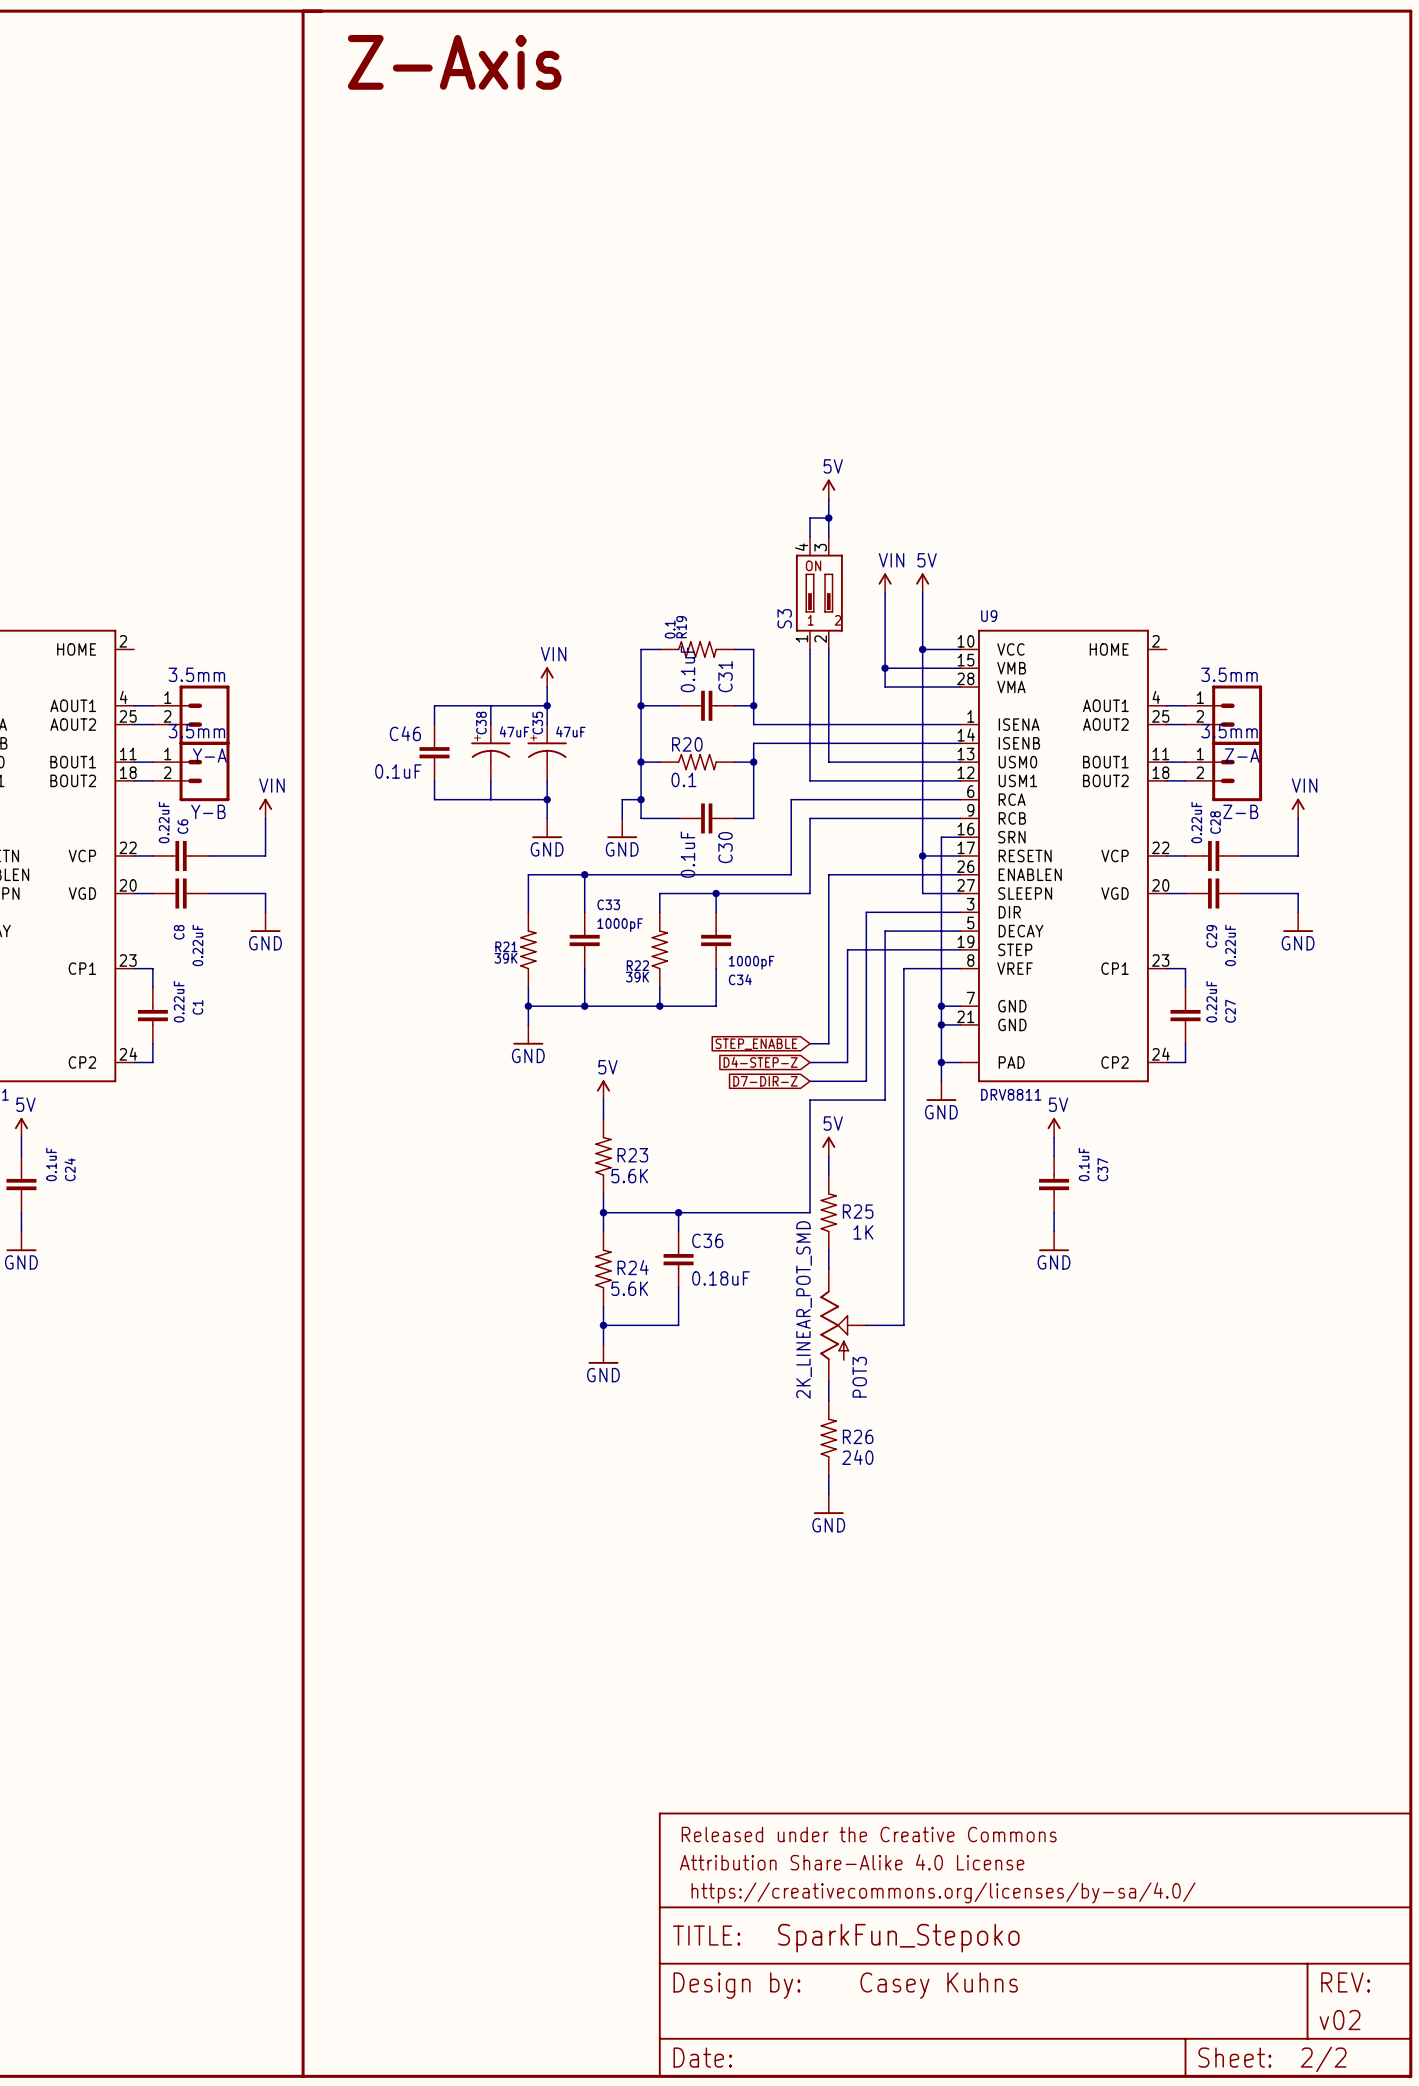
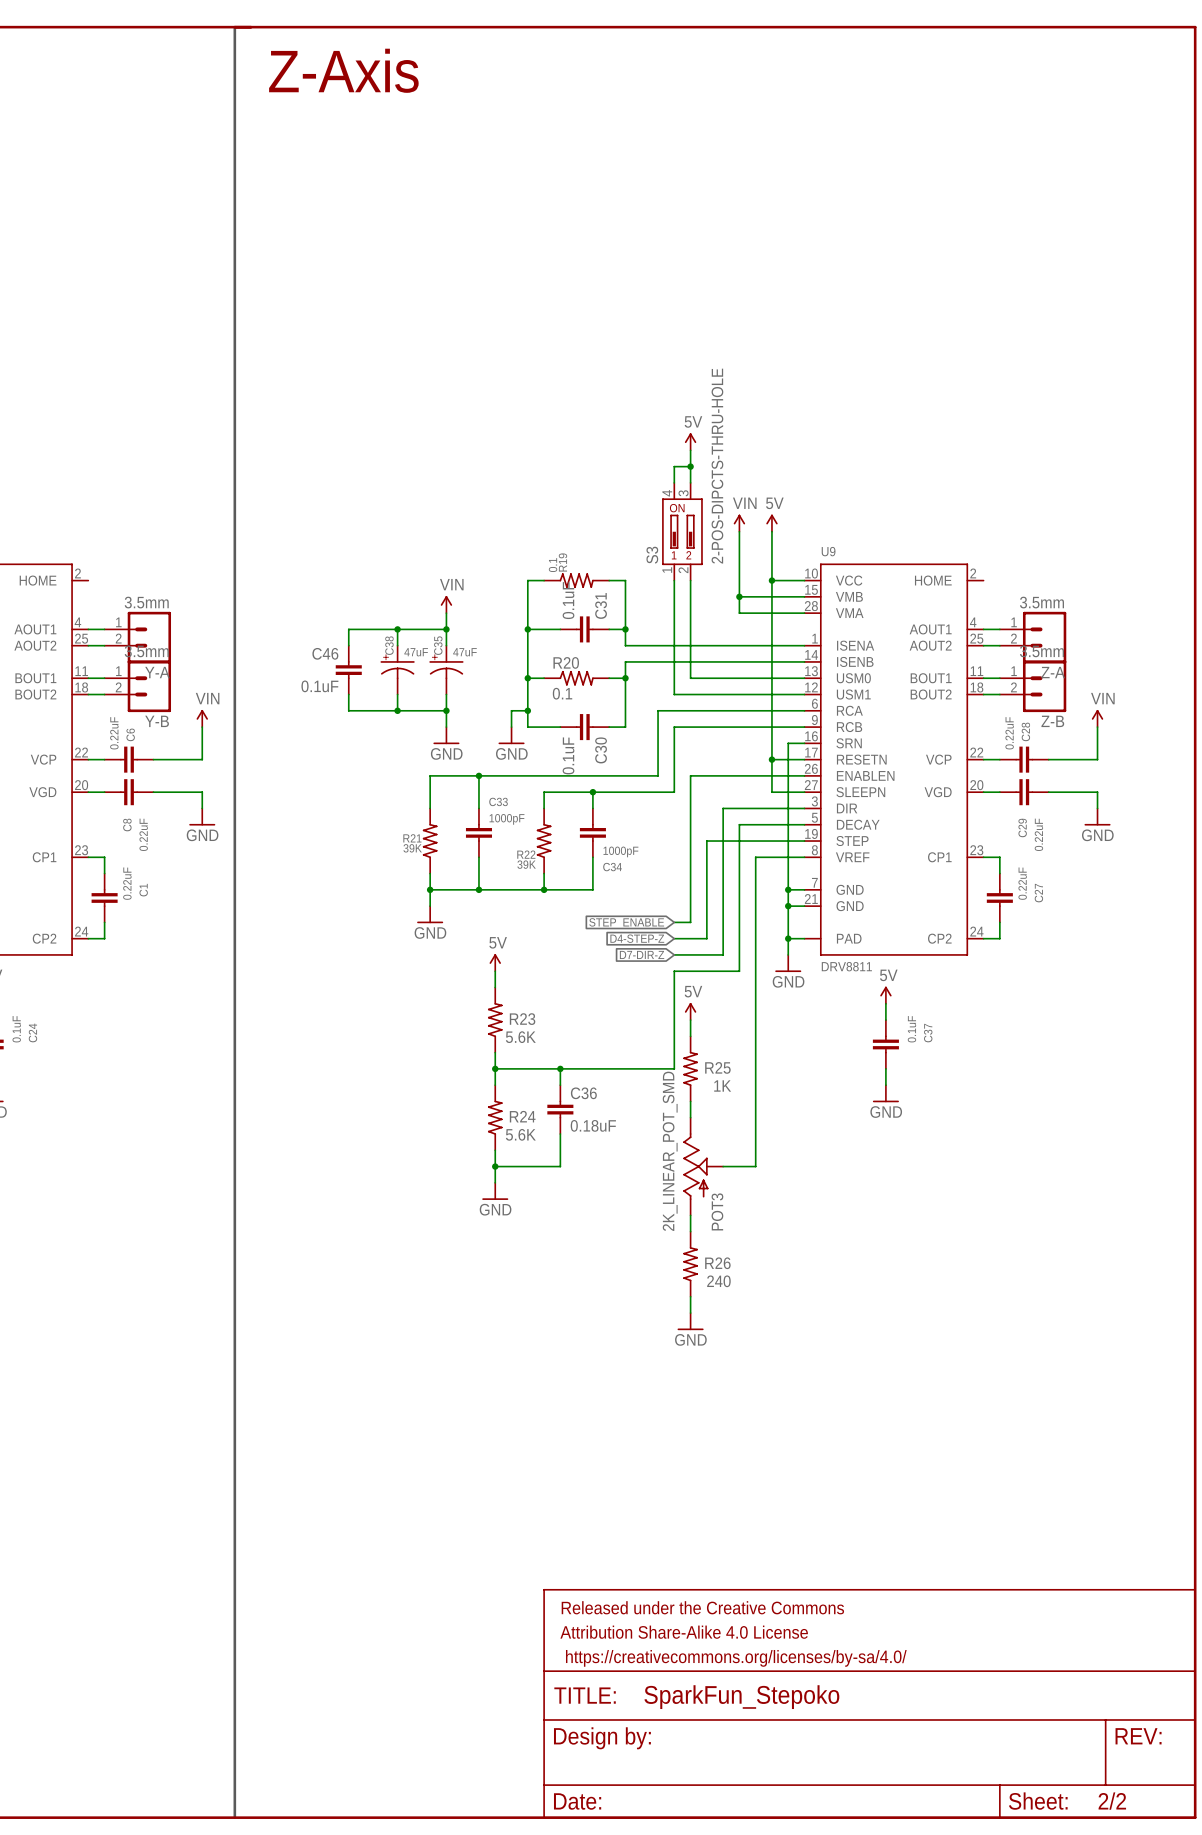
line: (303, 11) (303, 2076) -> none
line: none -> (234, 27) (234, 1817)
S3 value: none -> 2-POS-DIPCTS-THRU-HOLE (717, 466)
junction: none -> (397, 629)
junction: none -> (397, 710)
part text: Casey Kuhns (939, 1985) -> none
part text: v02 (1340, 2020) -> none

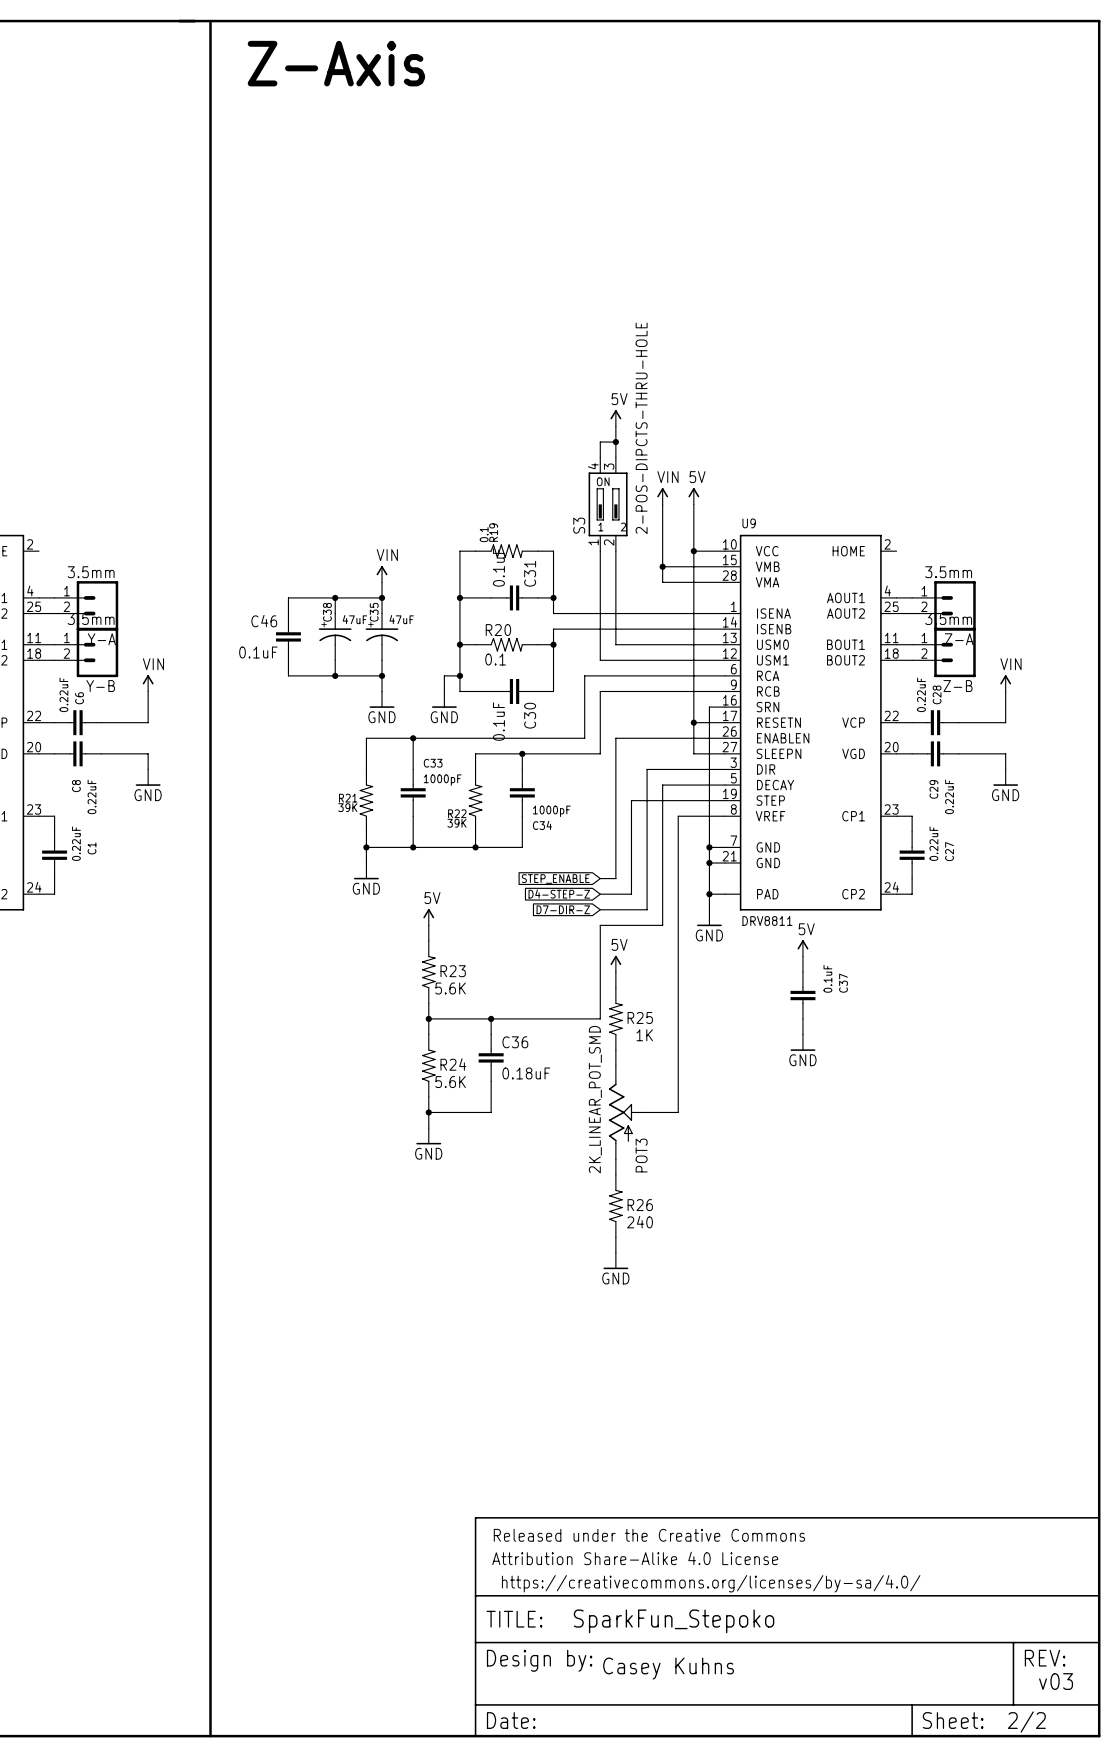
line: (234, 27) (234, 1817) -> (210, 21) (210, 1736)
text position: Z-Axis (343, 70) -> Z-Axis (336, 63)
text: none -> Casey Kuhns (668, 1668)
text: none -> v03 (1056, 1681)

